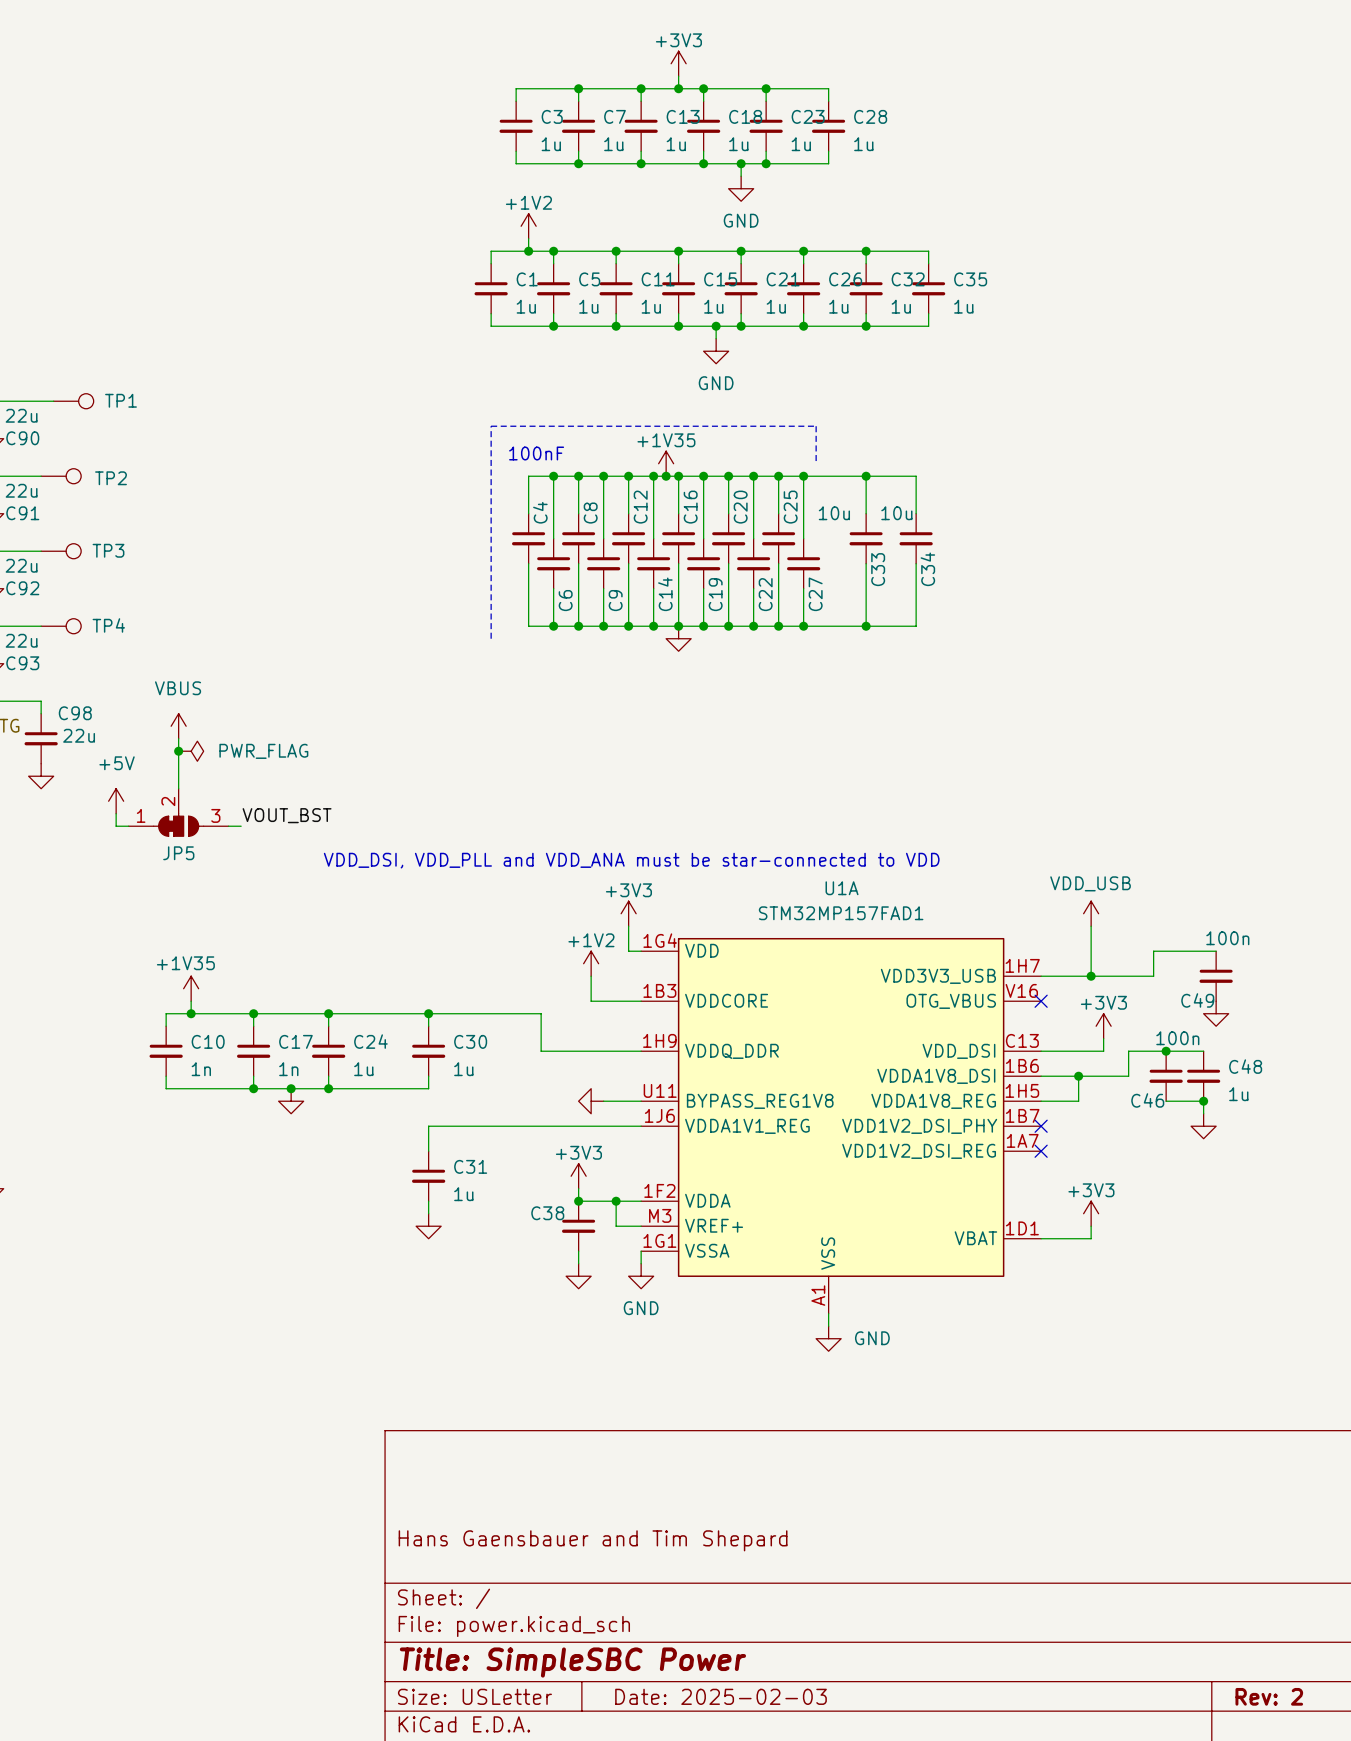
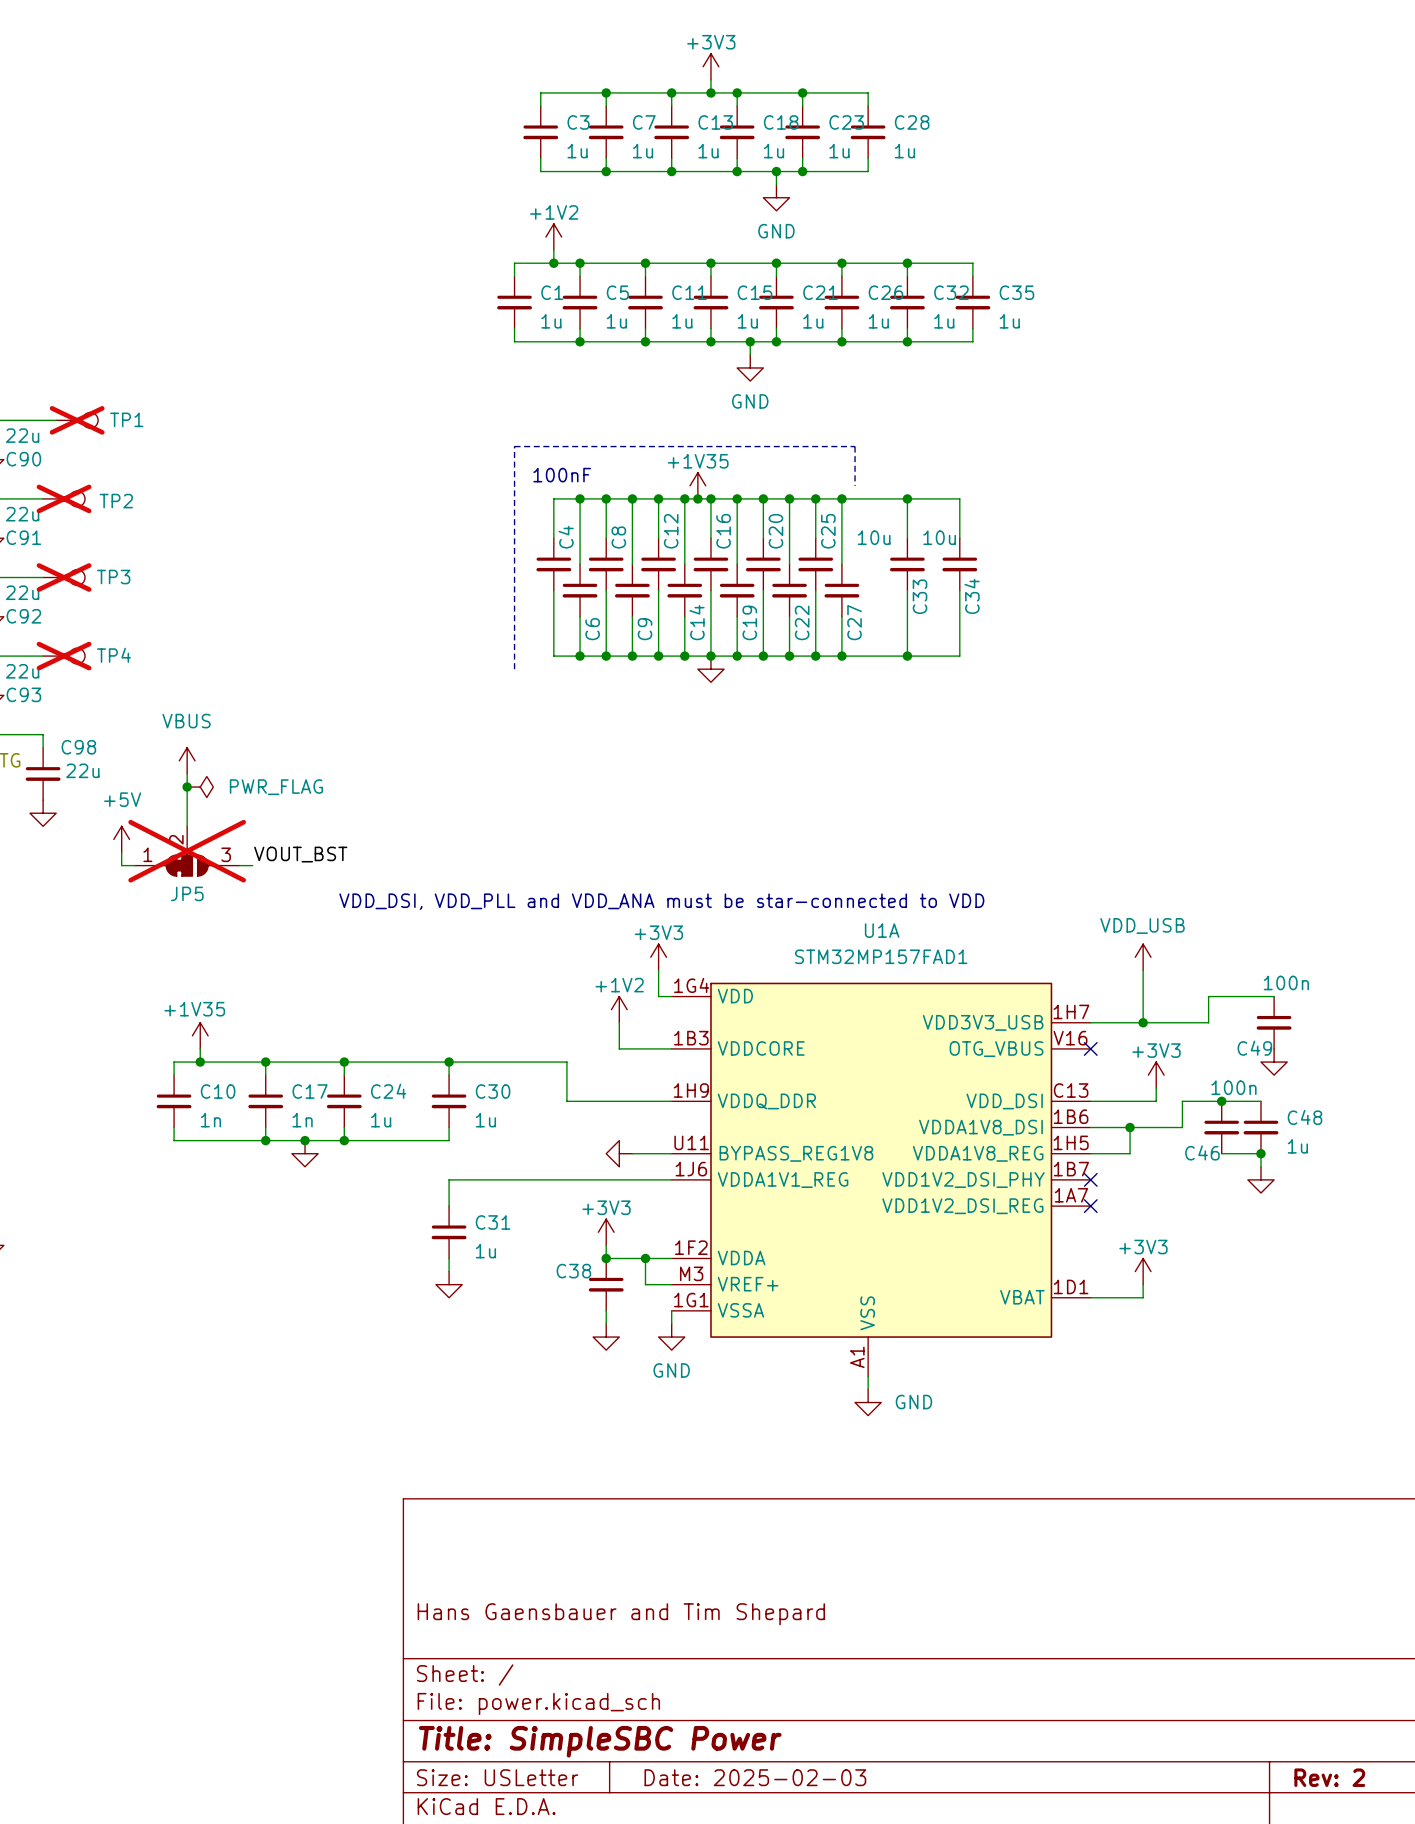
TP1 do-not-place cross: none -> (77, 420)
TP2 do-not-place cross: none -> (64, 498)
TP3 do-not-place cross: none -> (64, 577)
TP4 do-not-place cross: none -> (64, 656)
JP5 do-not-place cross: none -> (187, 851)

